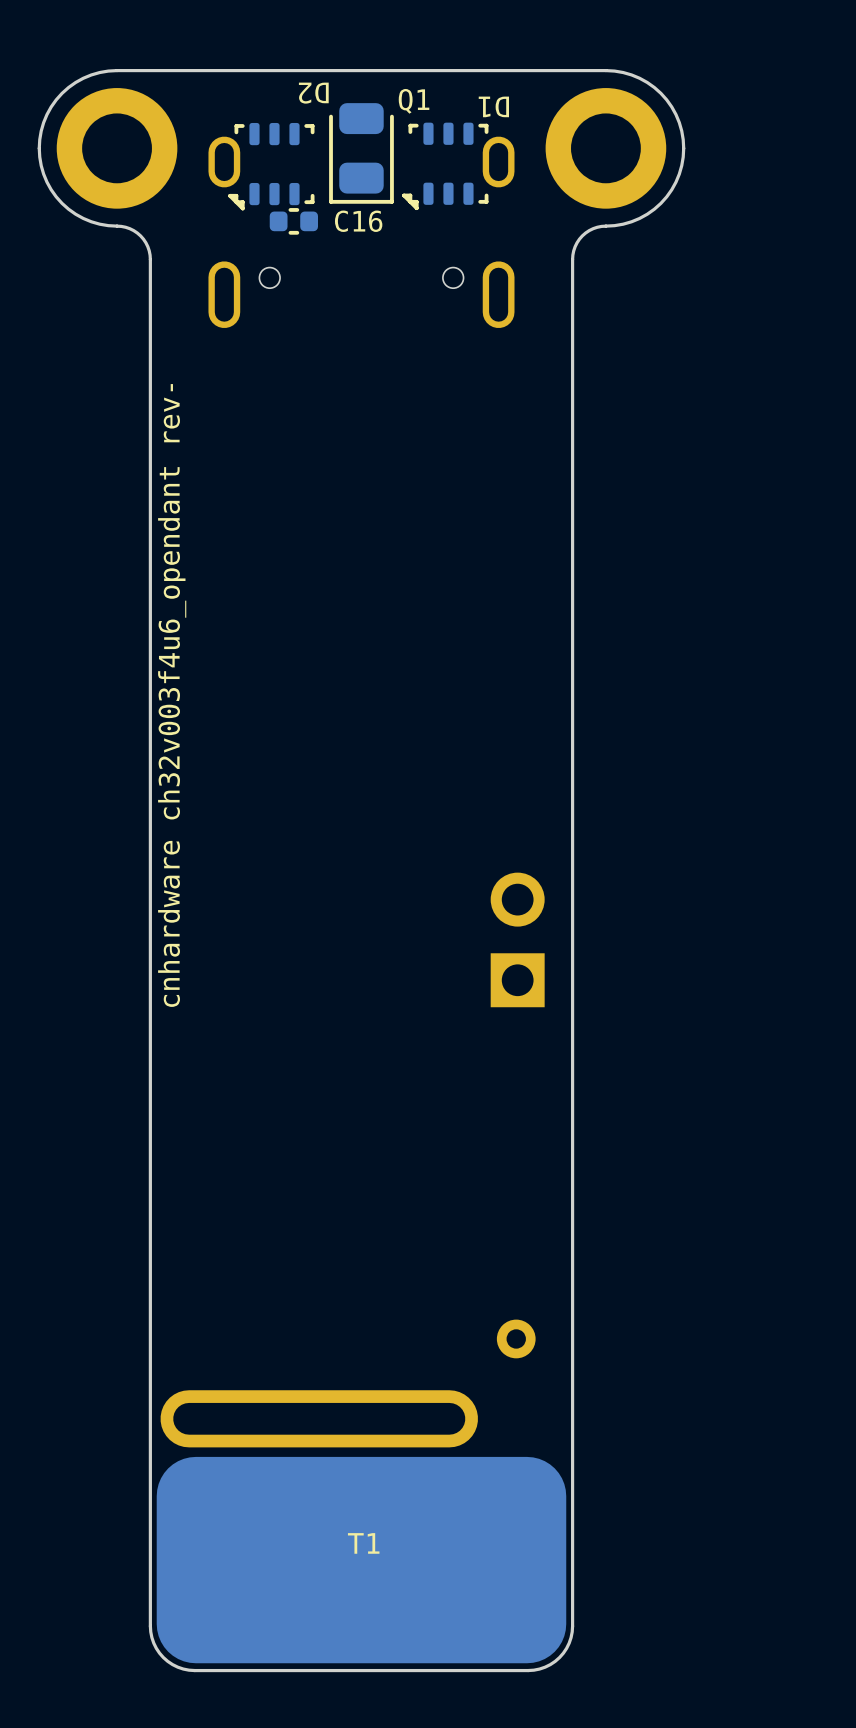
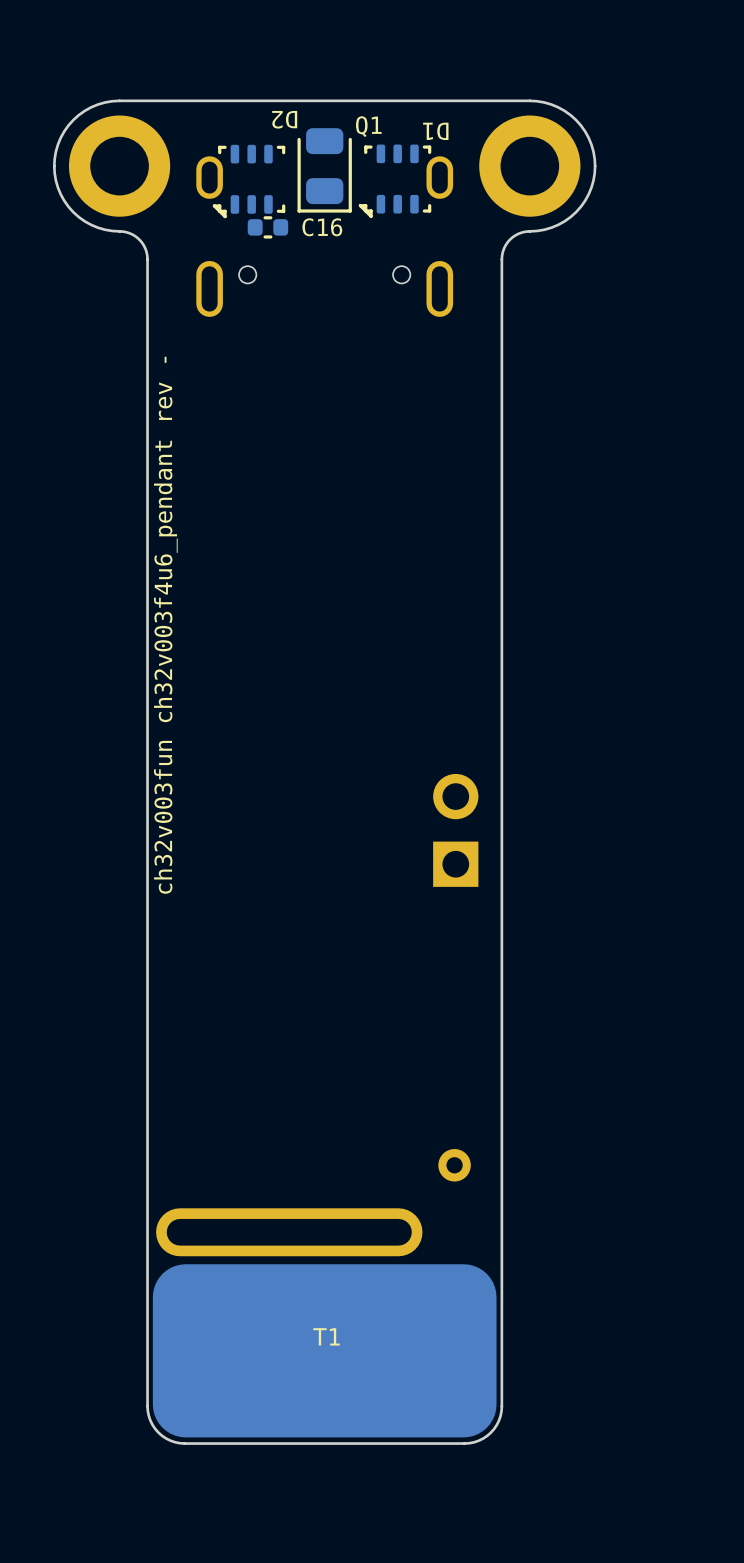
text: cnhardware ch32v003f4u6_opendant rev- (172, 695) -> ch32v003fun ch32v003f4u6_pendant rev - (165, 625)

